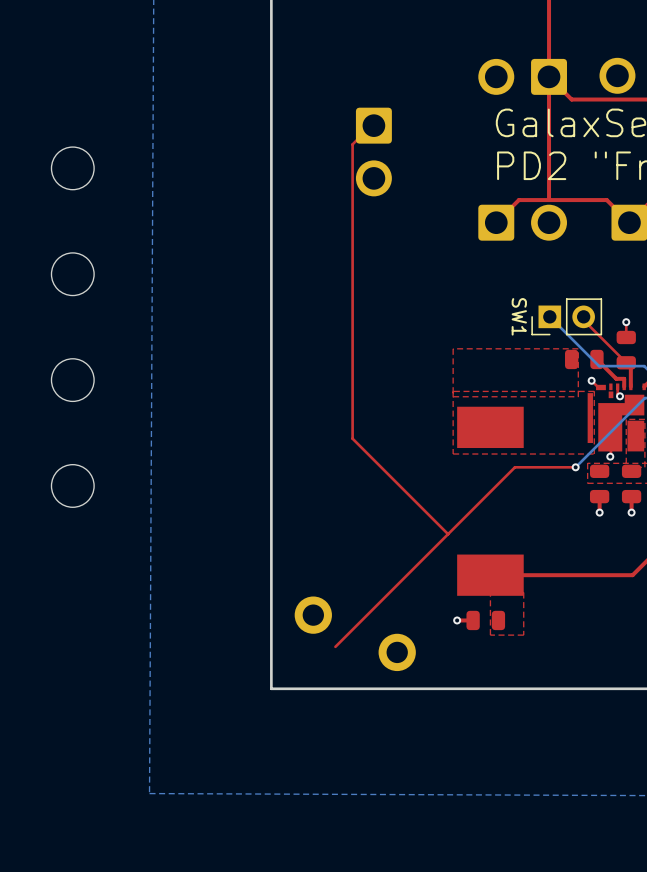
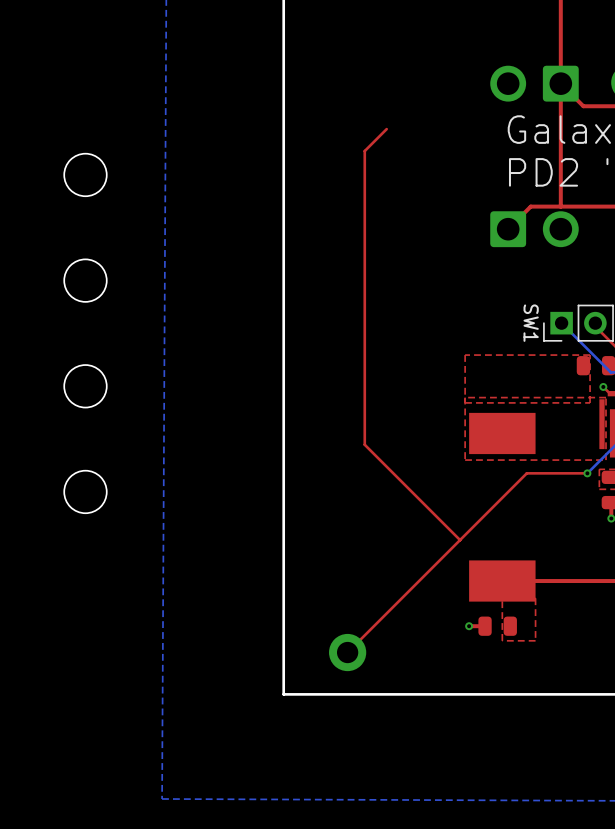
part: (373, 152) -> none
part: (313, 615) -> none
part: none -> (347, 652)
part: (397, 652) -> none

